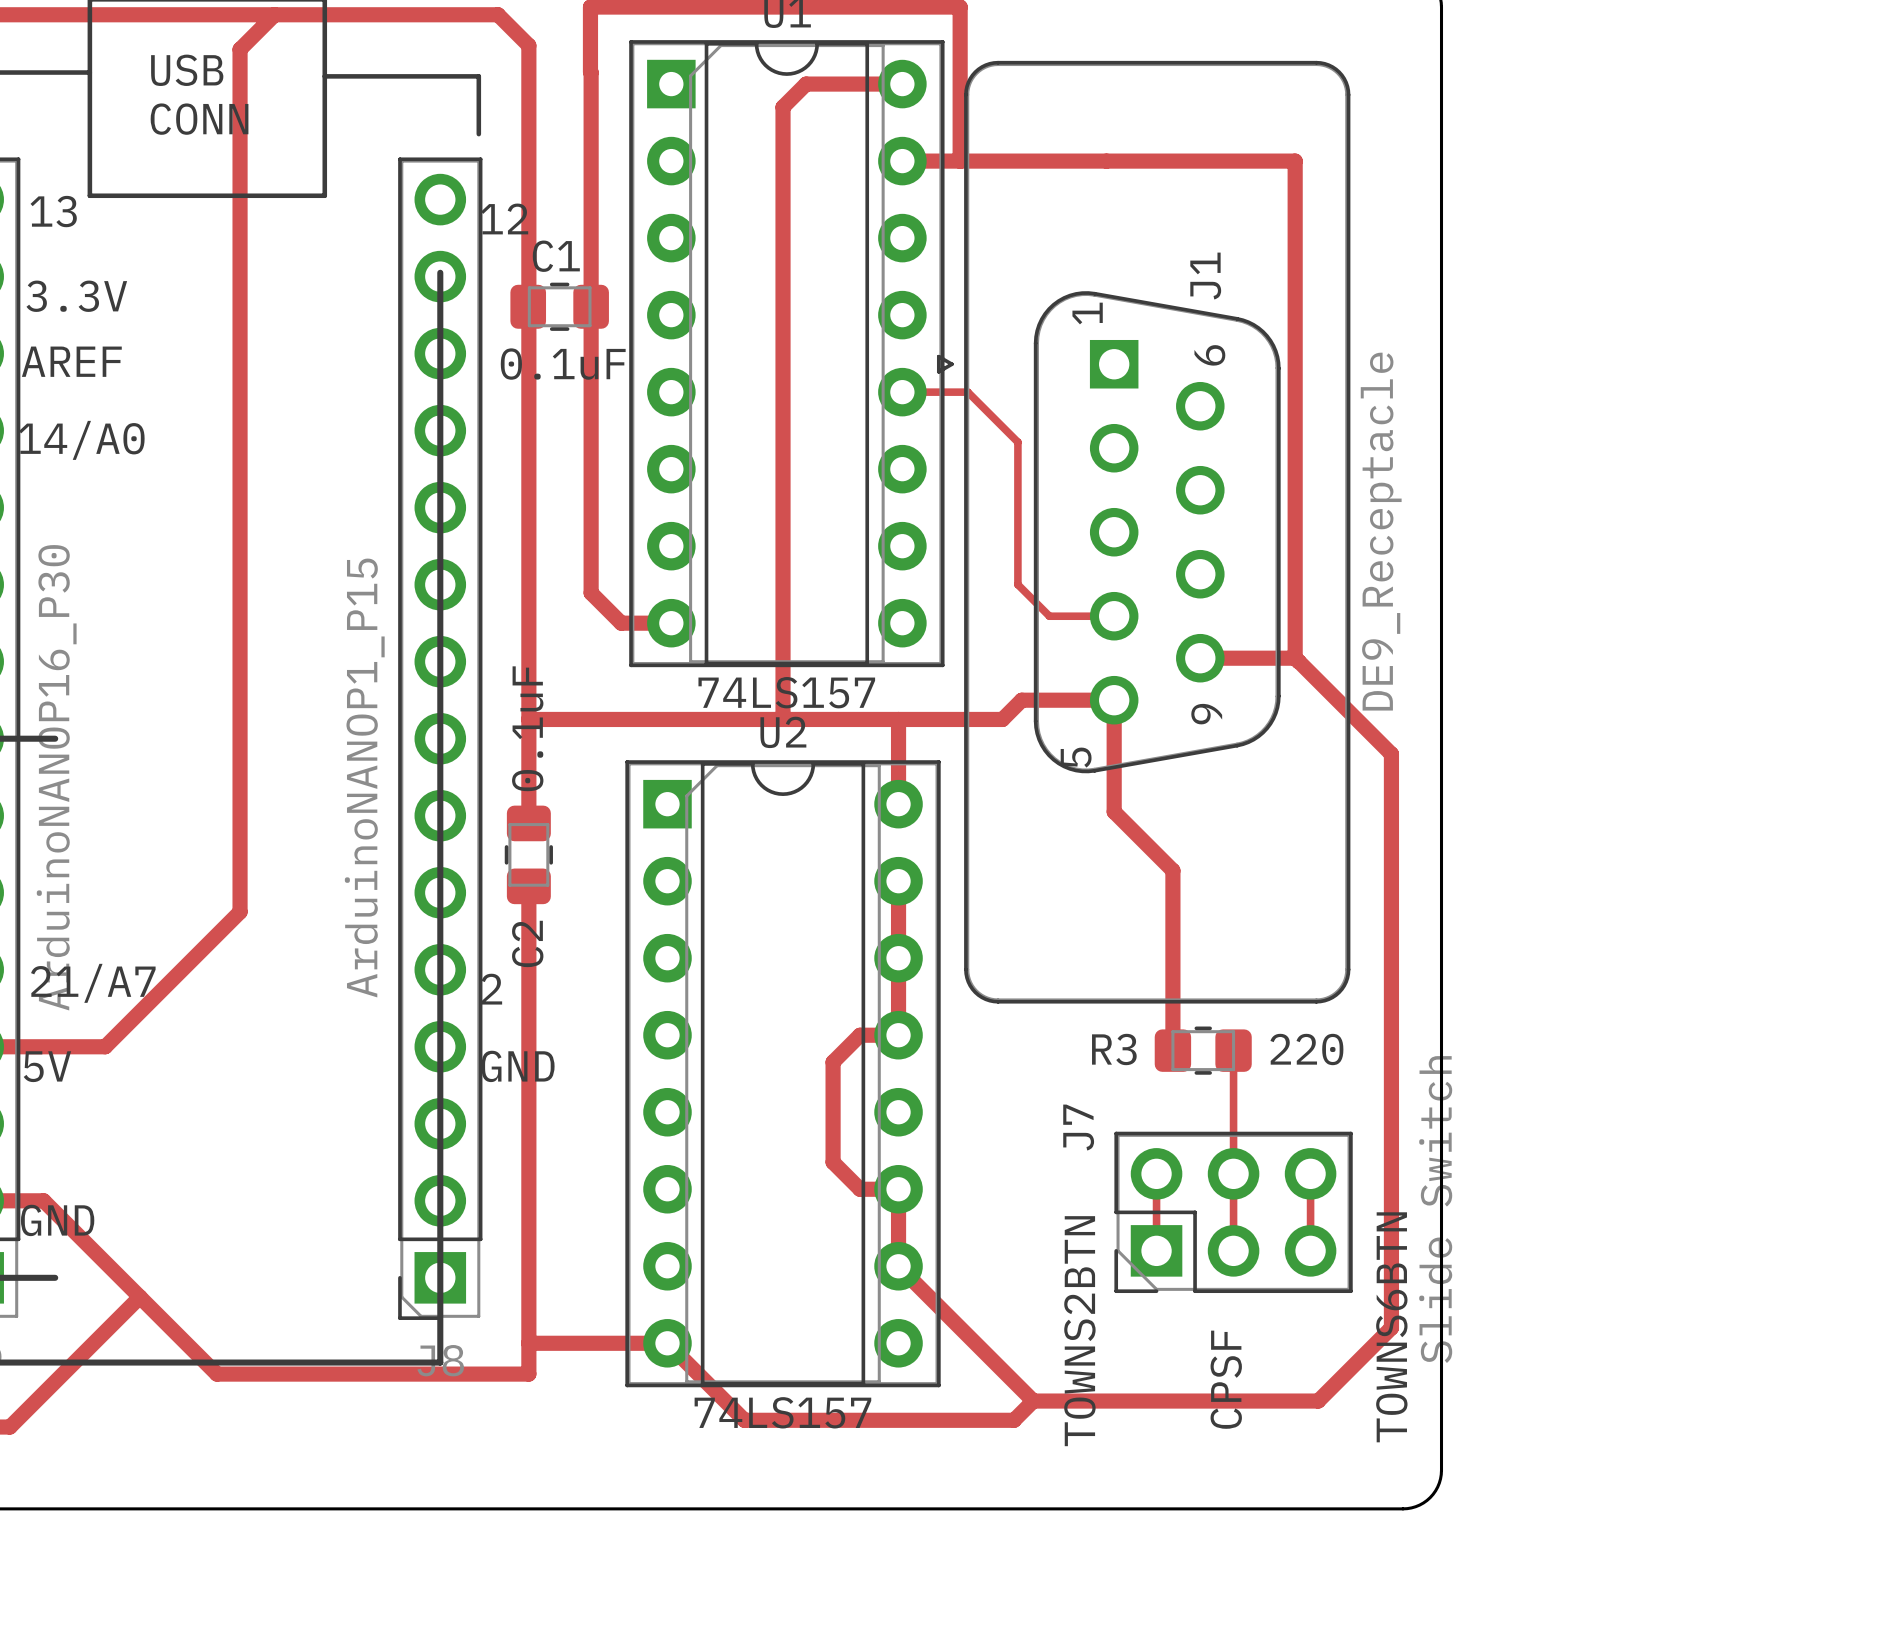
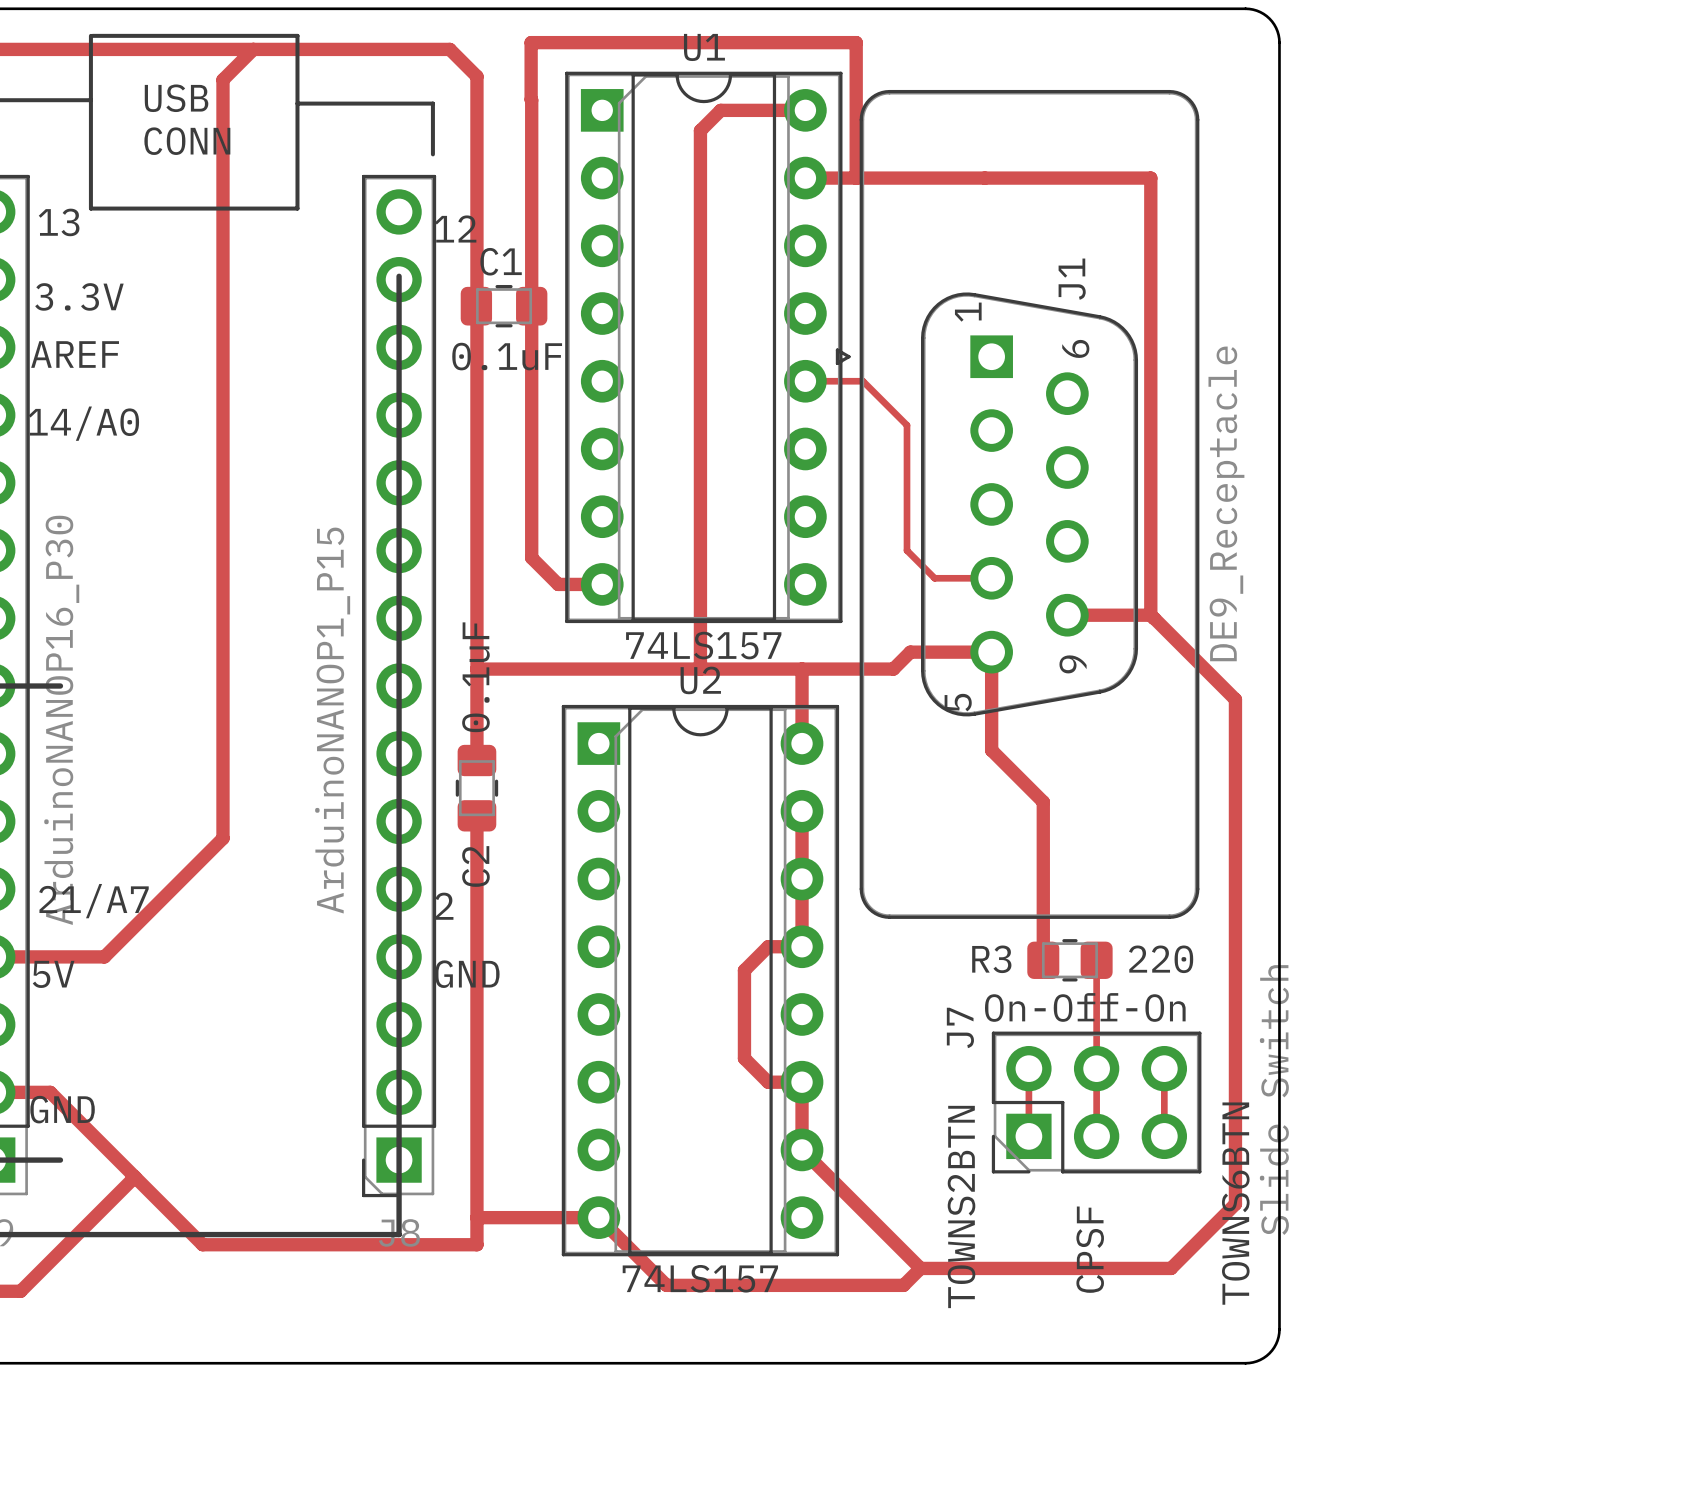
text: none -> On-Off-On (1085, 1007)

